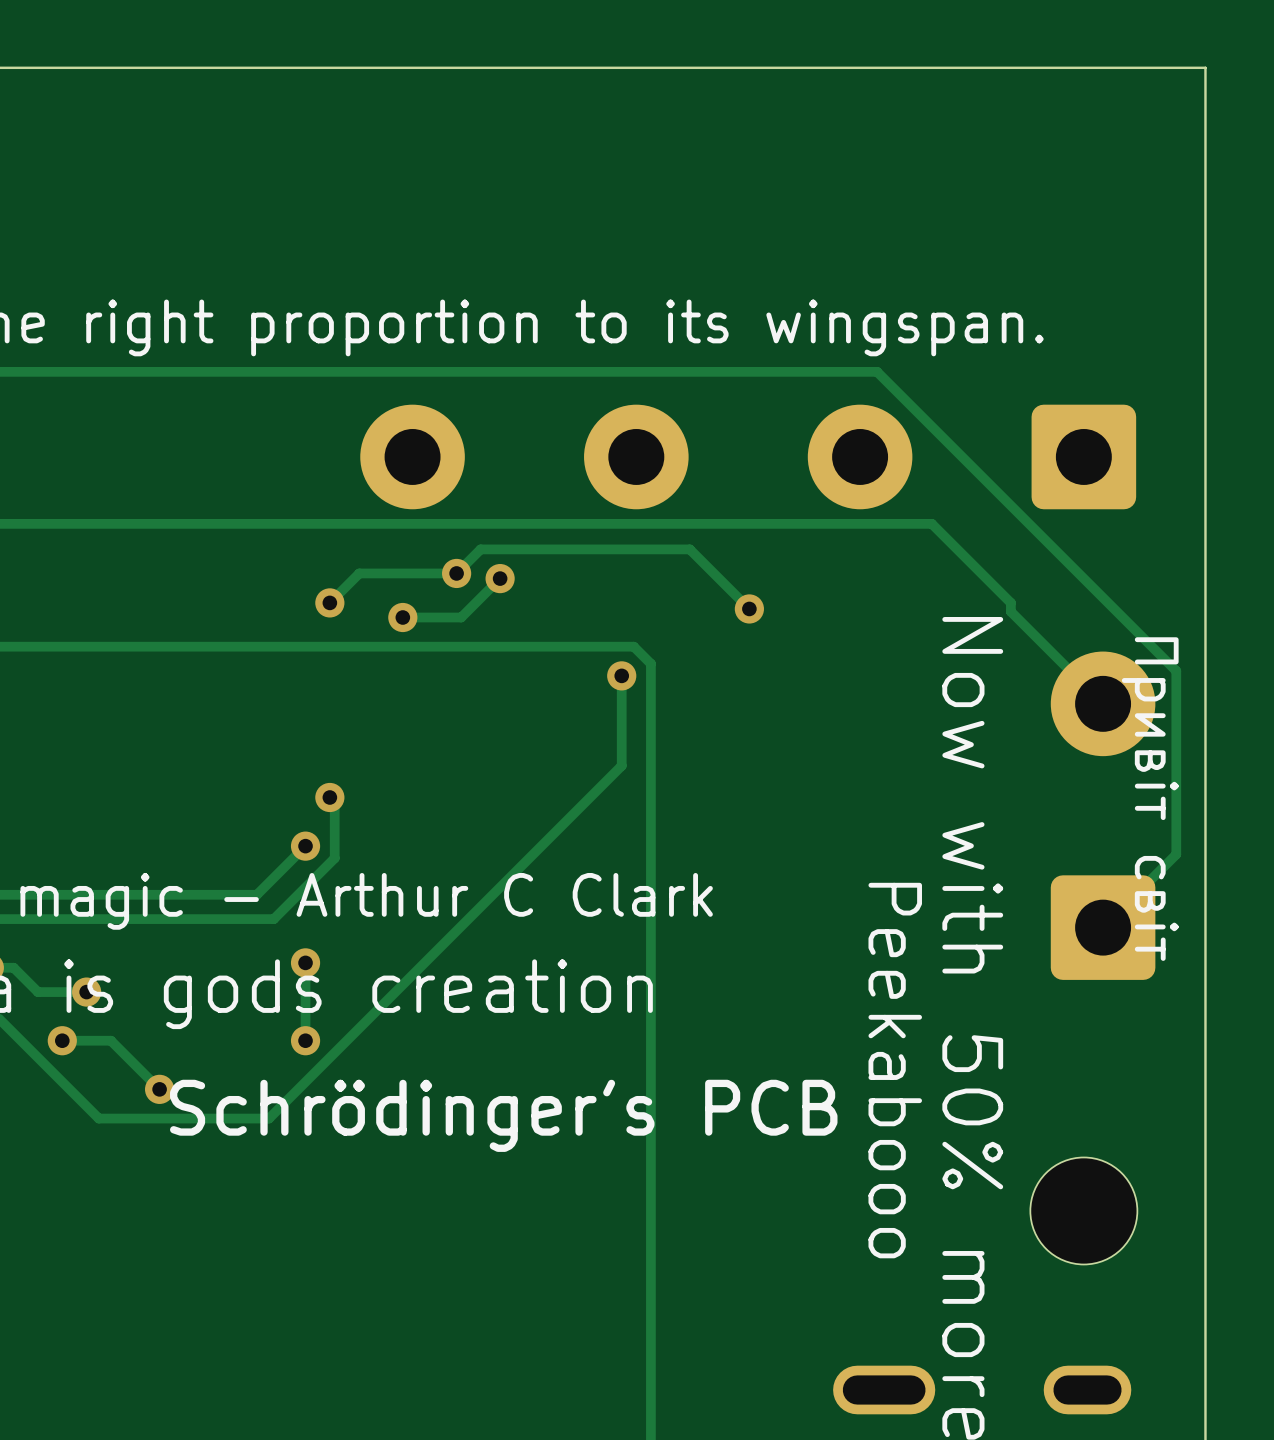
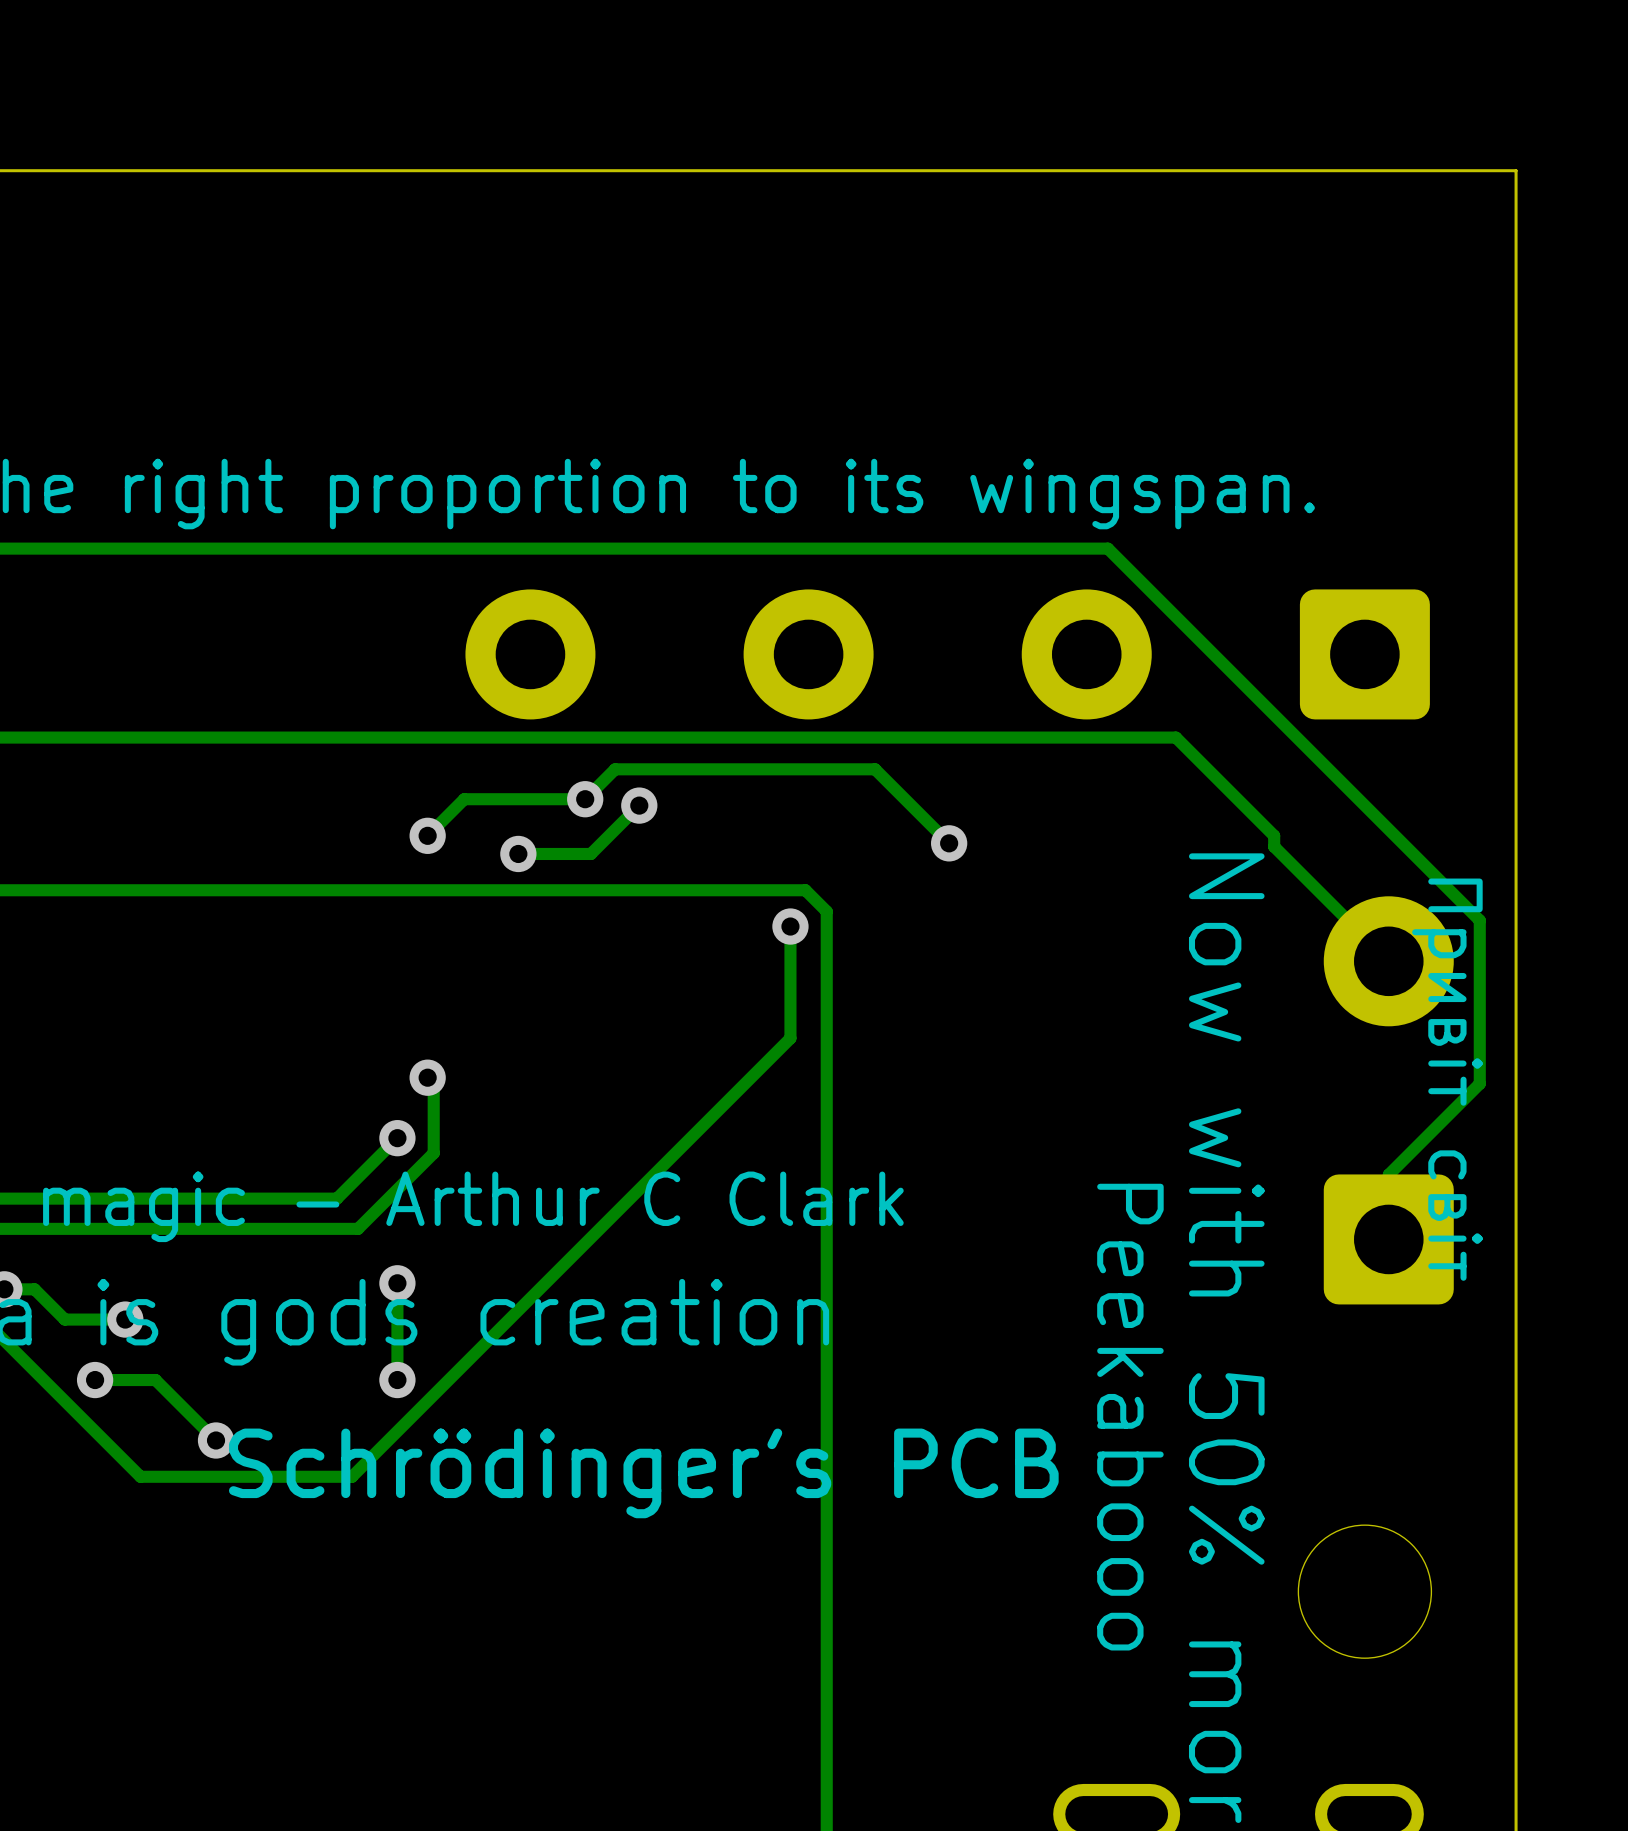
track: (1176, 802) (1176, 854) (1103, 927) -> (1479, 1083) (1388, 1174) (1388, 1239)

